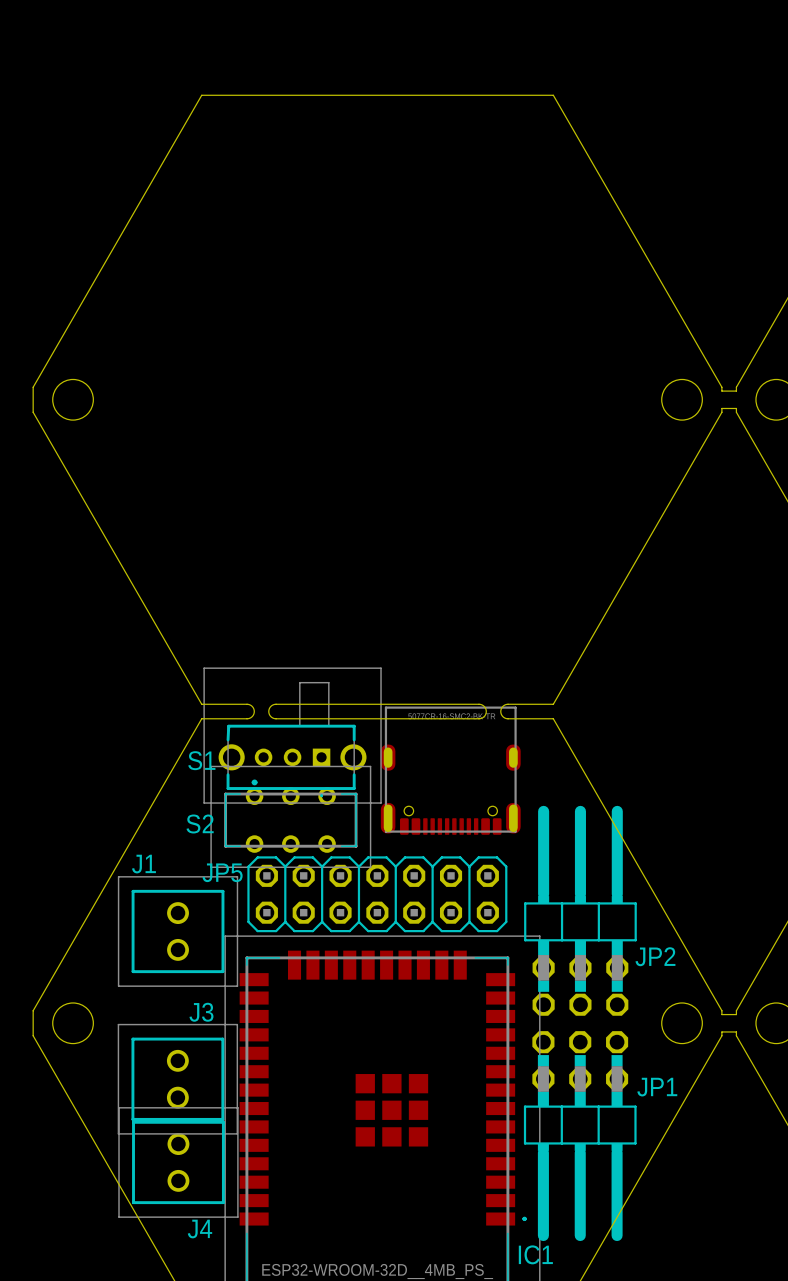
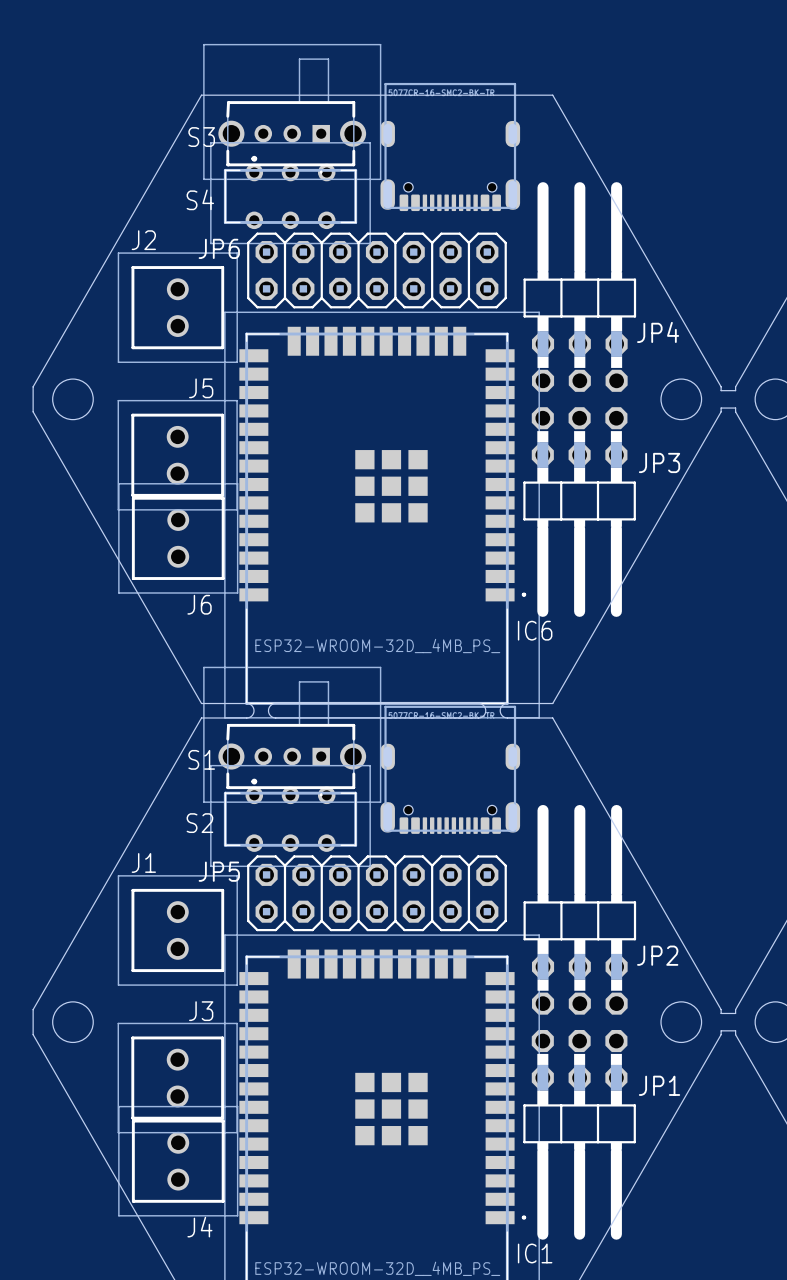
S3: none -> (292, 111)
part: none -> (450, 146)
S4: none -> (290, 193)
JP6: none -> (376, 270)
JP4: none -> (579, 287)
J2: none -> (177, 307)
J5: none -> (177, 455)
JP3: none -> (579, 512)
IC6: none -> ESP32-WROOM-32D__4MB_PS_ (382, 515)
J6: none -> (178, 538)

